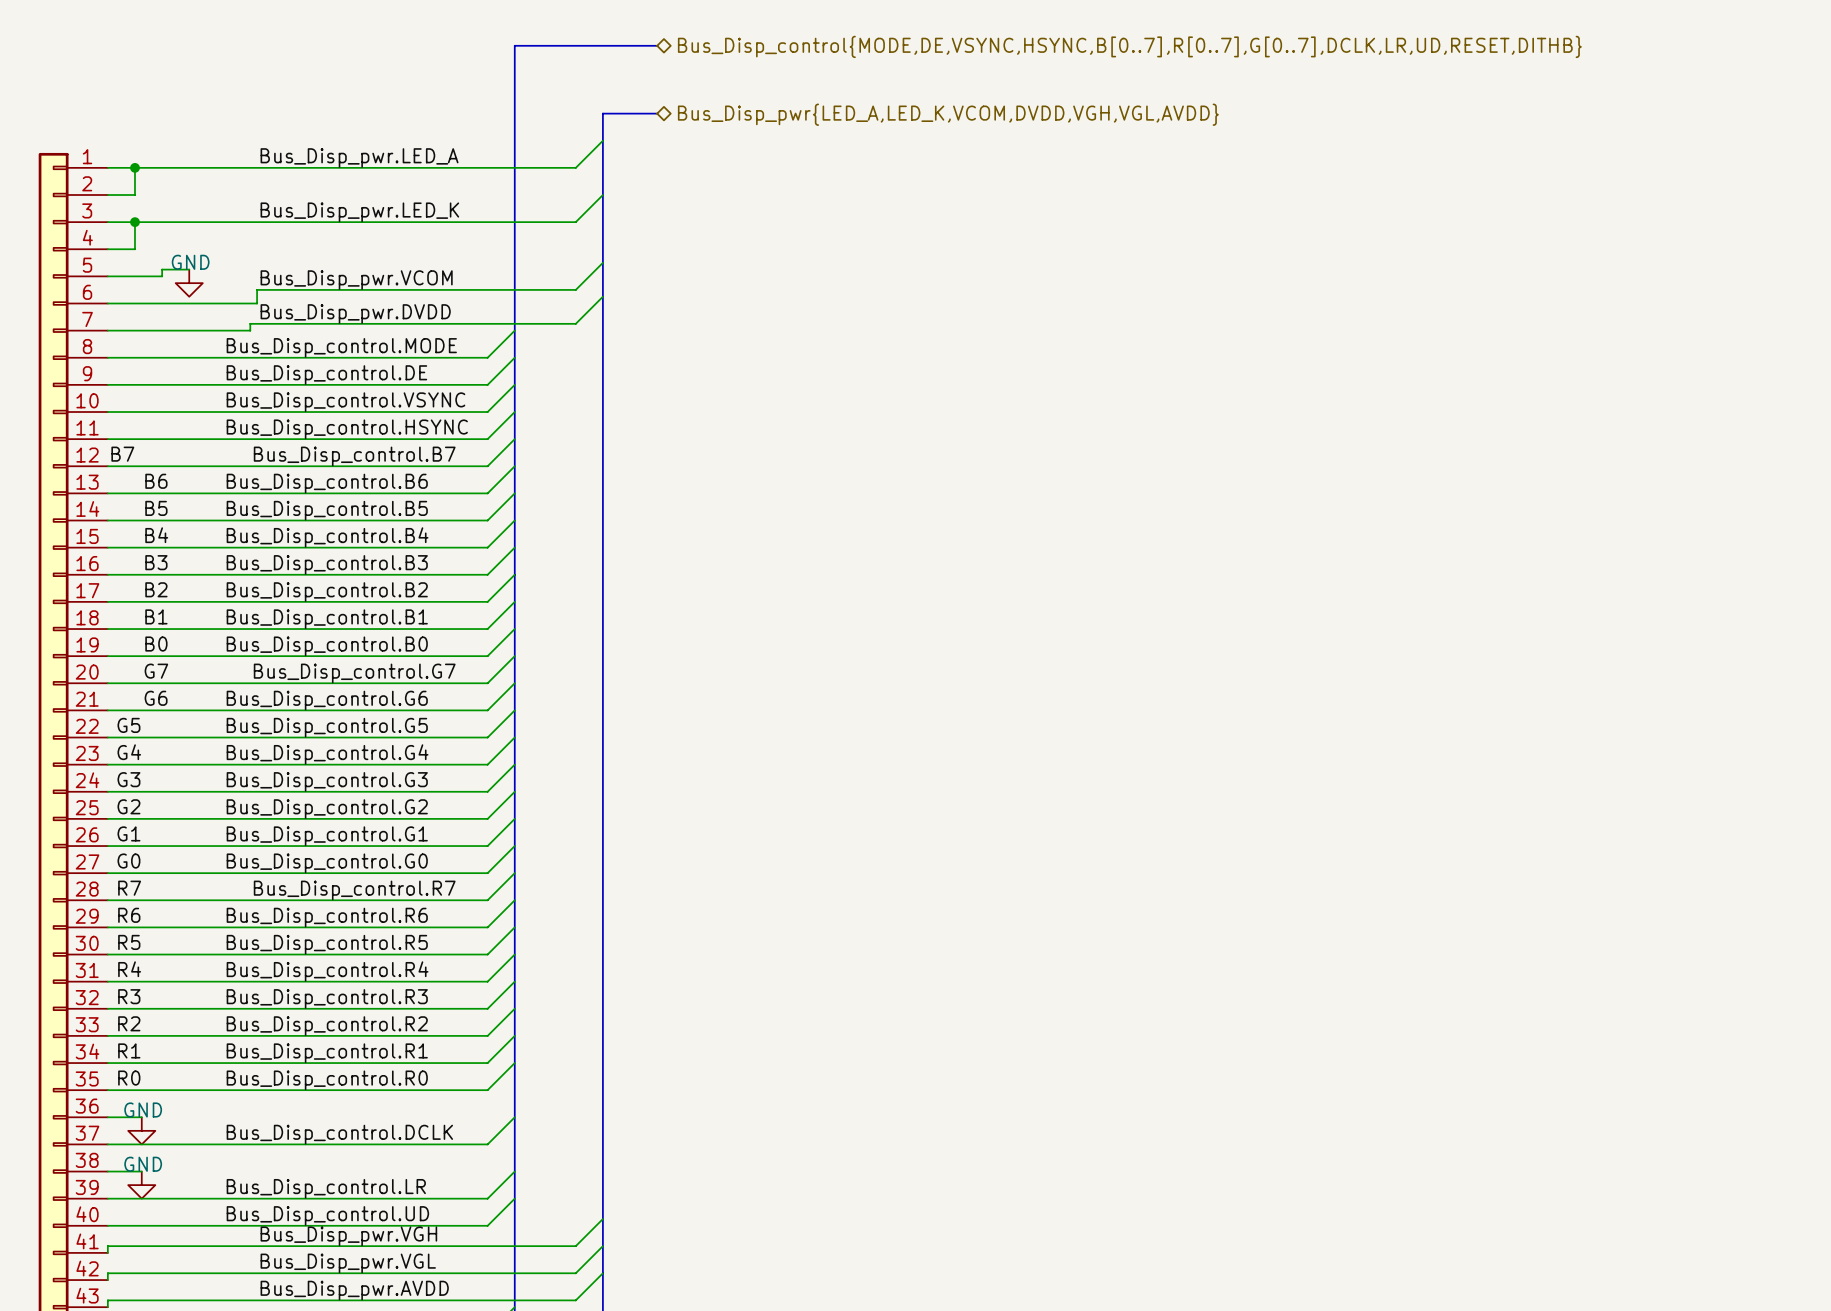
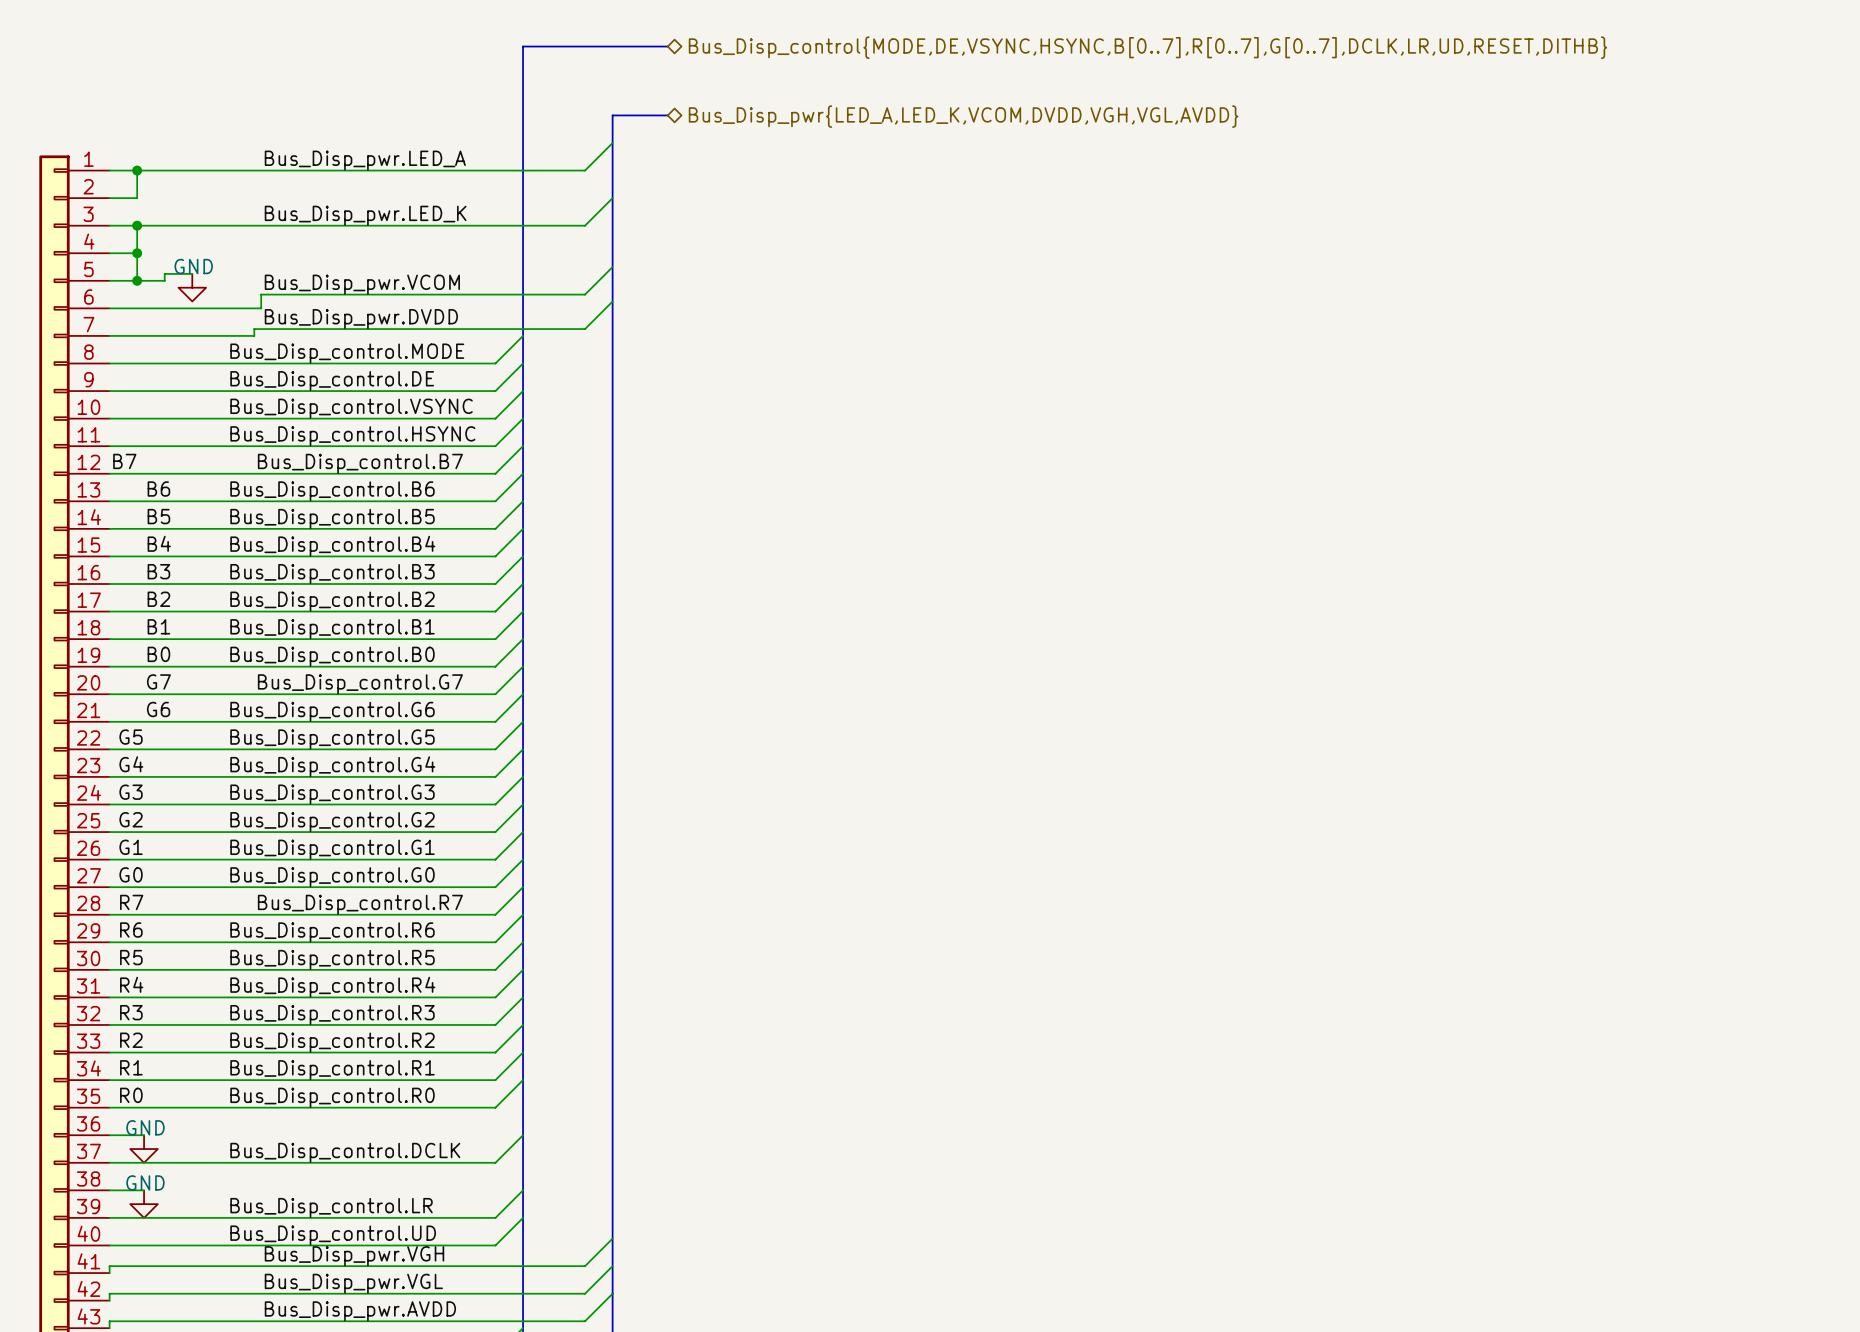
wire: none -> (137, 253) (137, 280)
junction: none -> (137, 253)
junction: none -> (137, 280)

